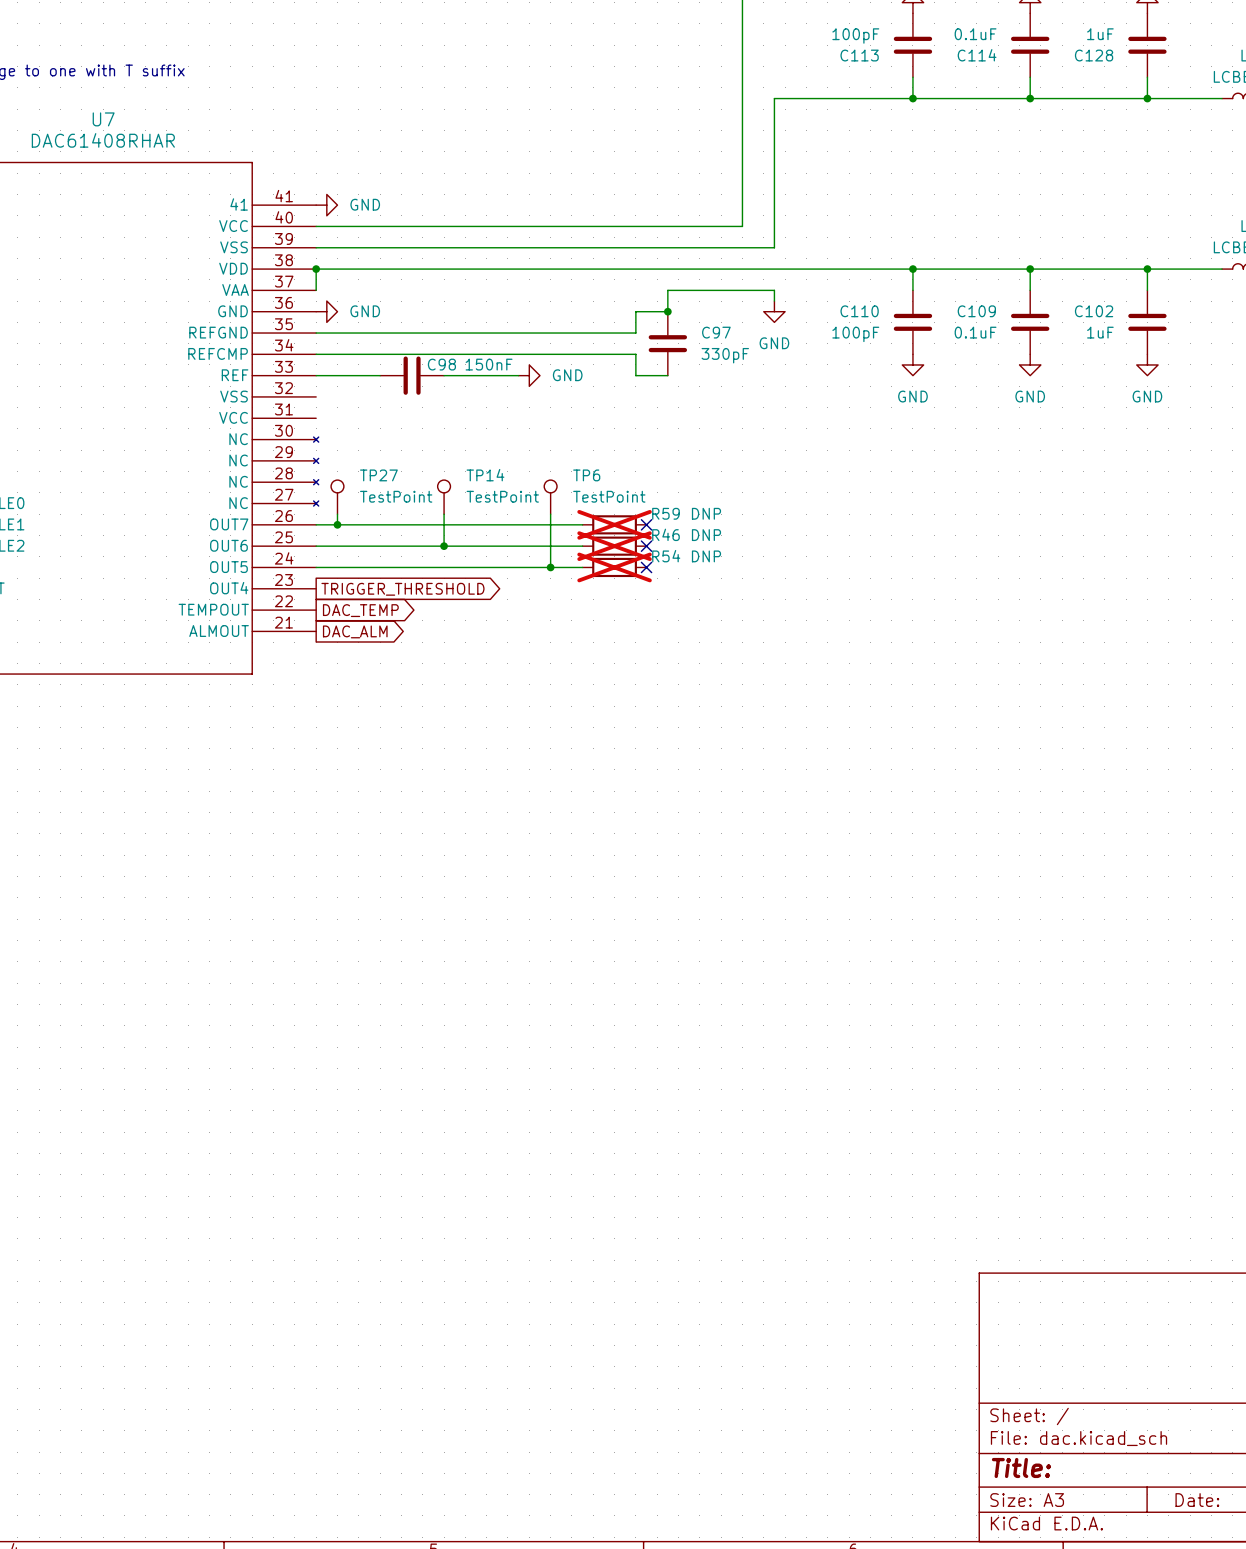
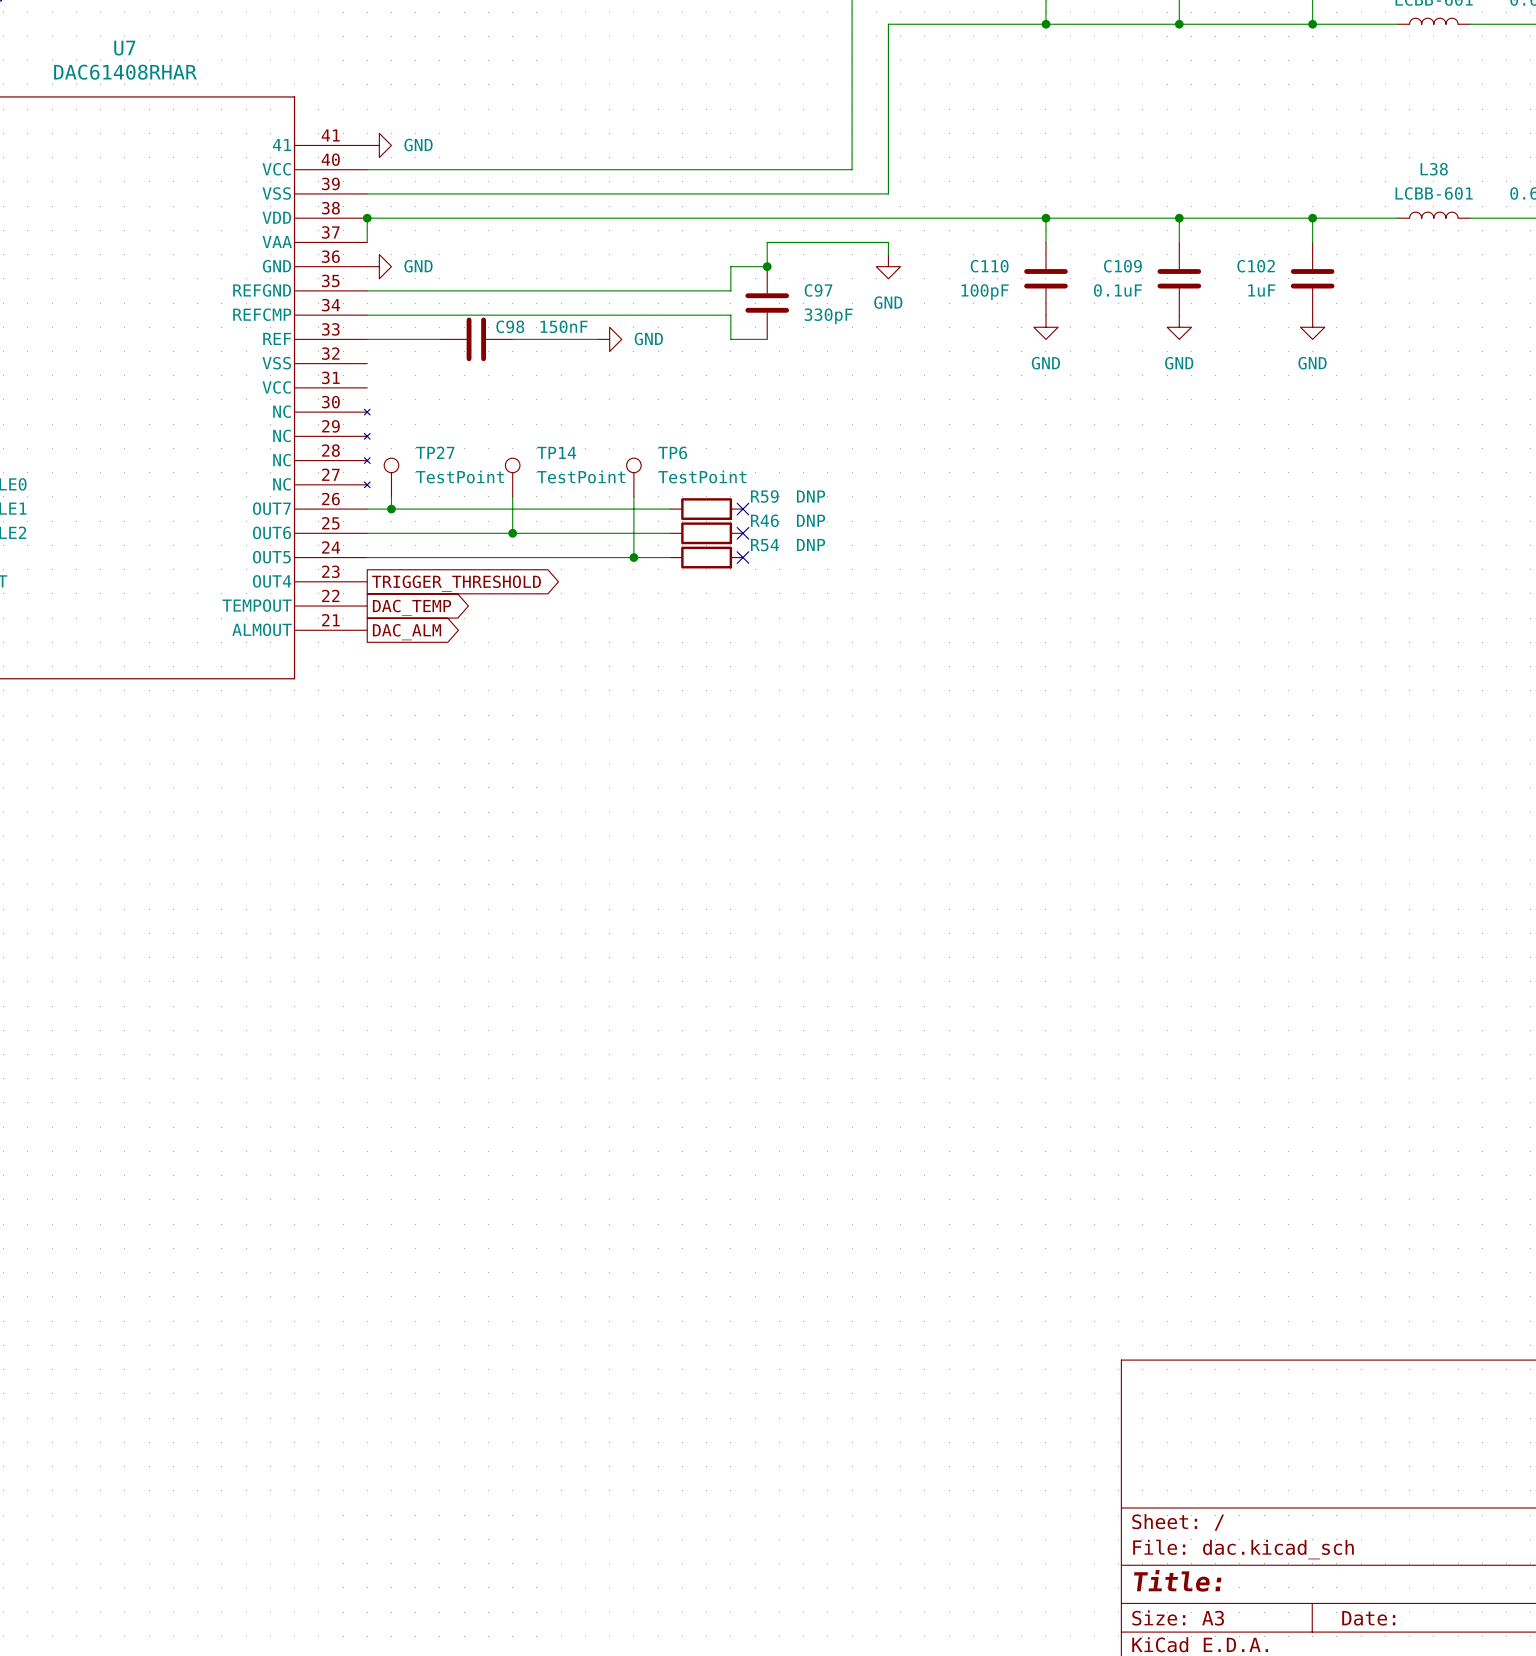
R59 do-not-place cross: (614, 524) -> none
R46 do-not-place cross: (614, 546) -> none
R54 do-not-place cross: (614, 567) -> none

